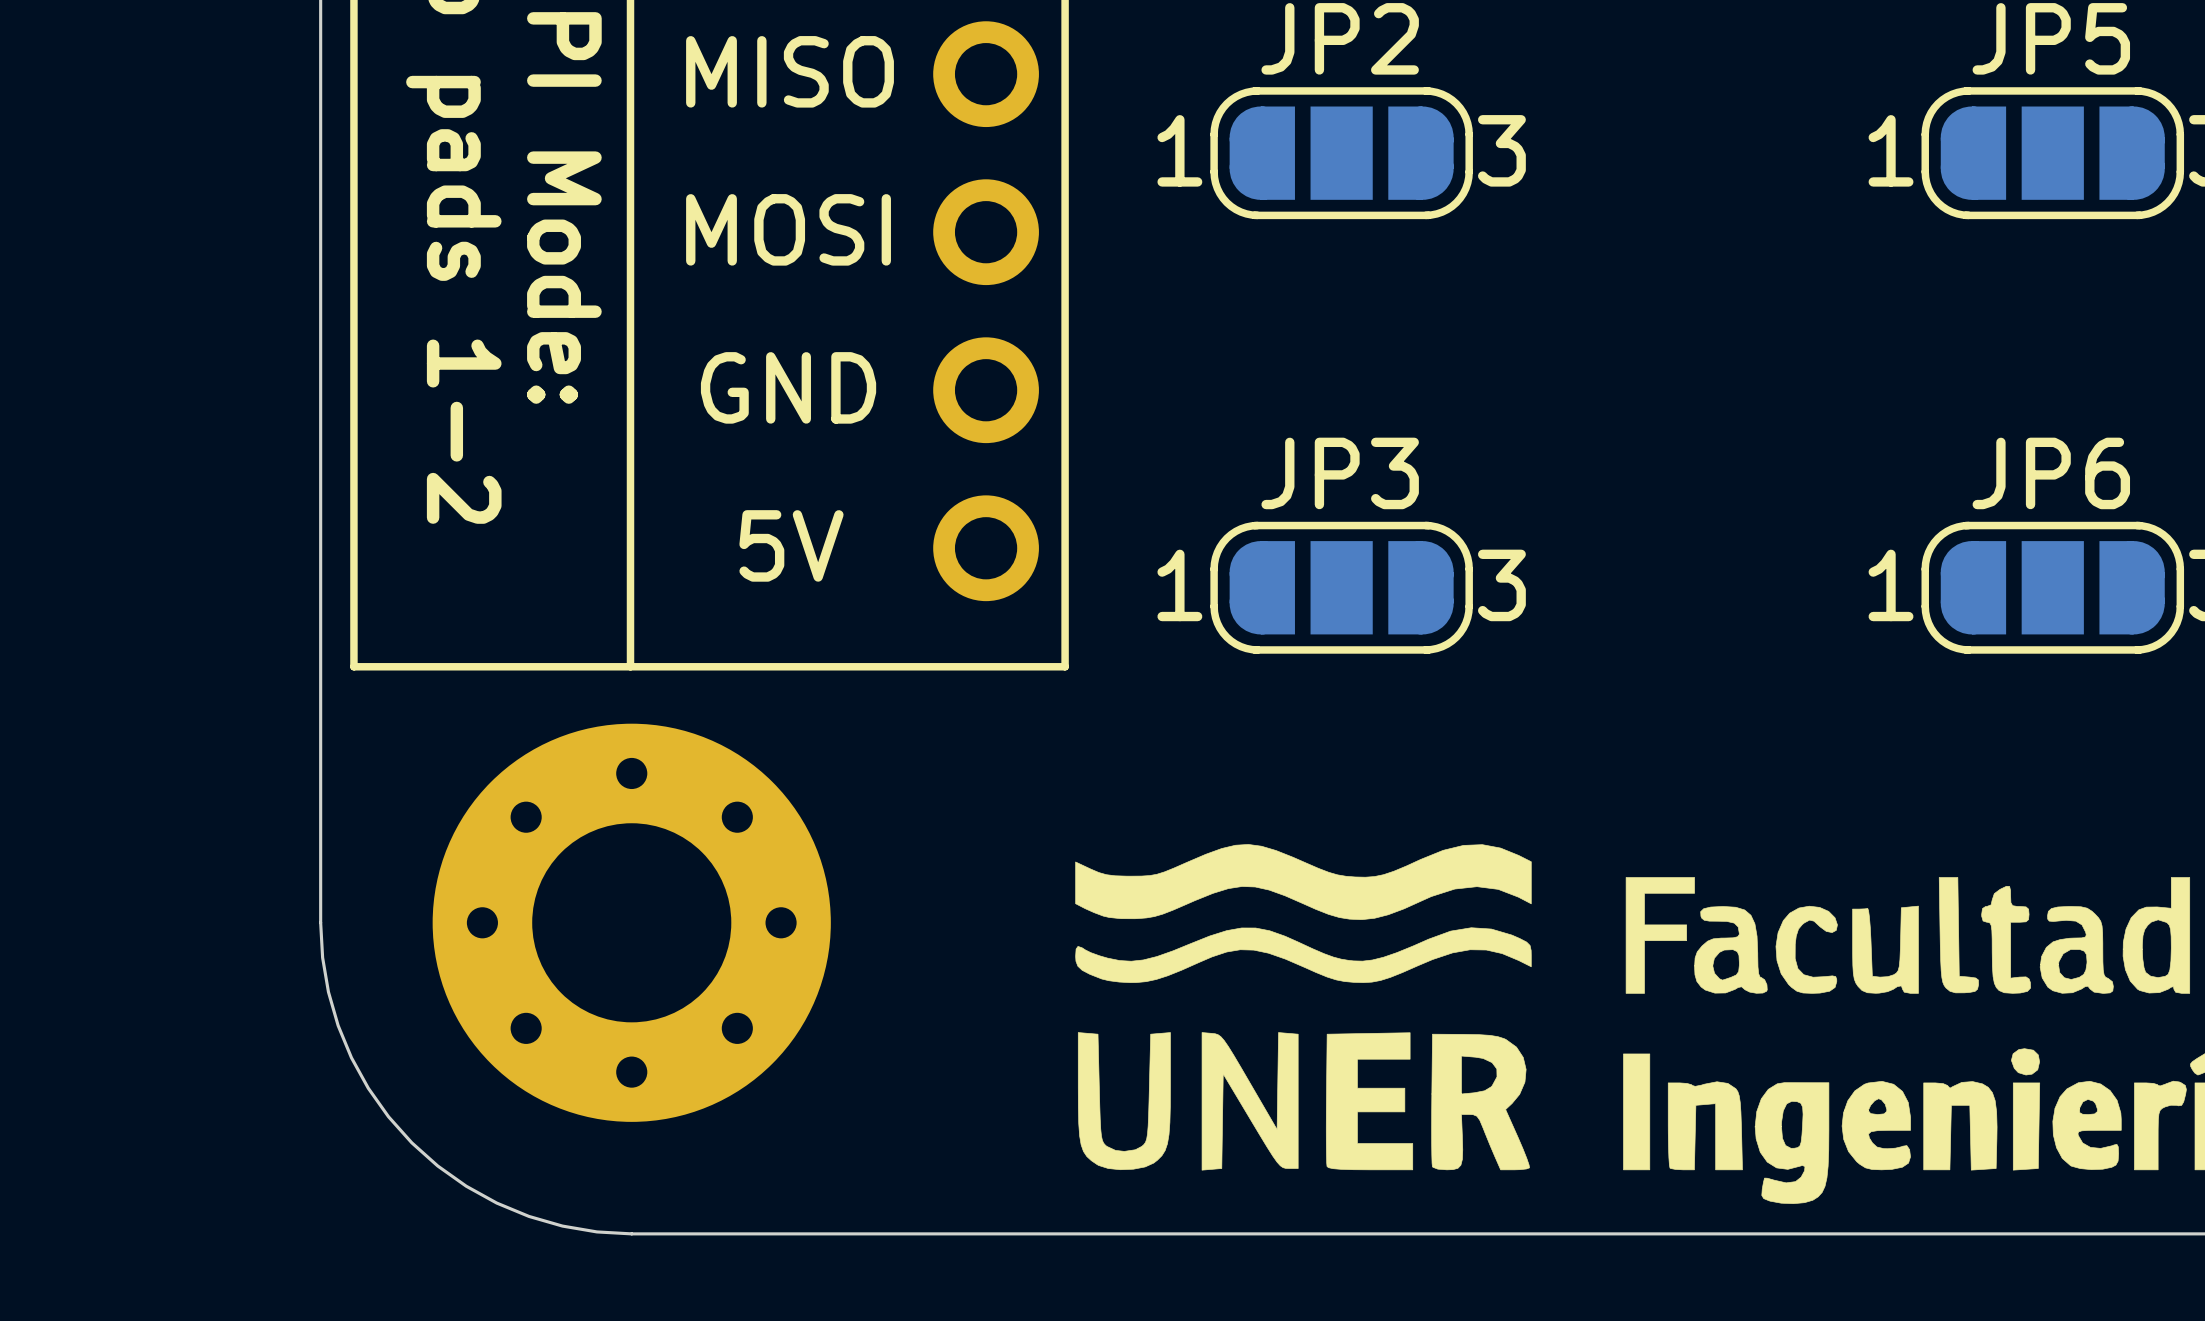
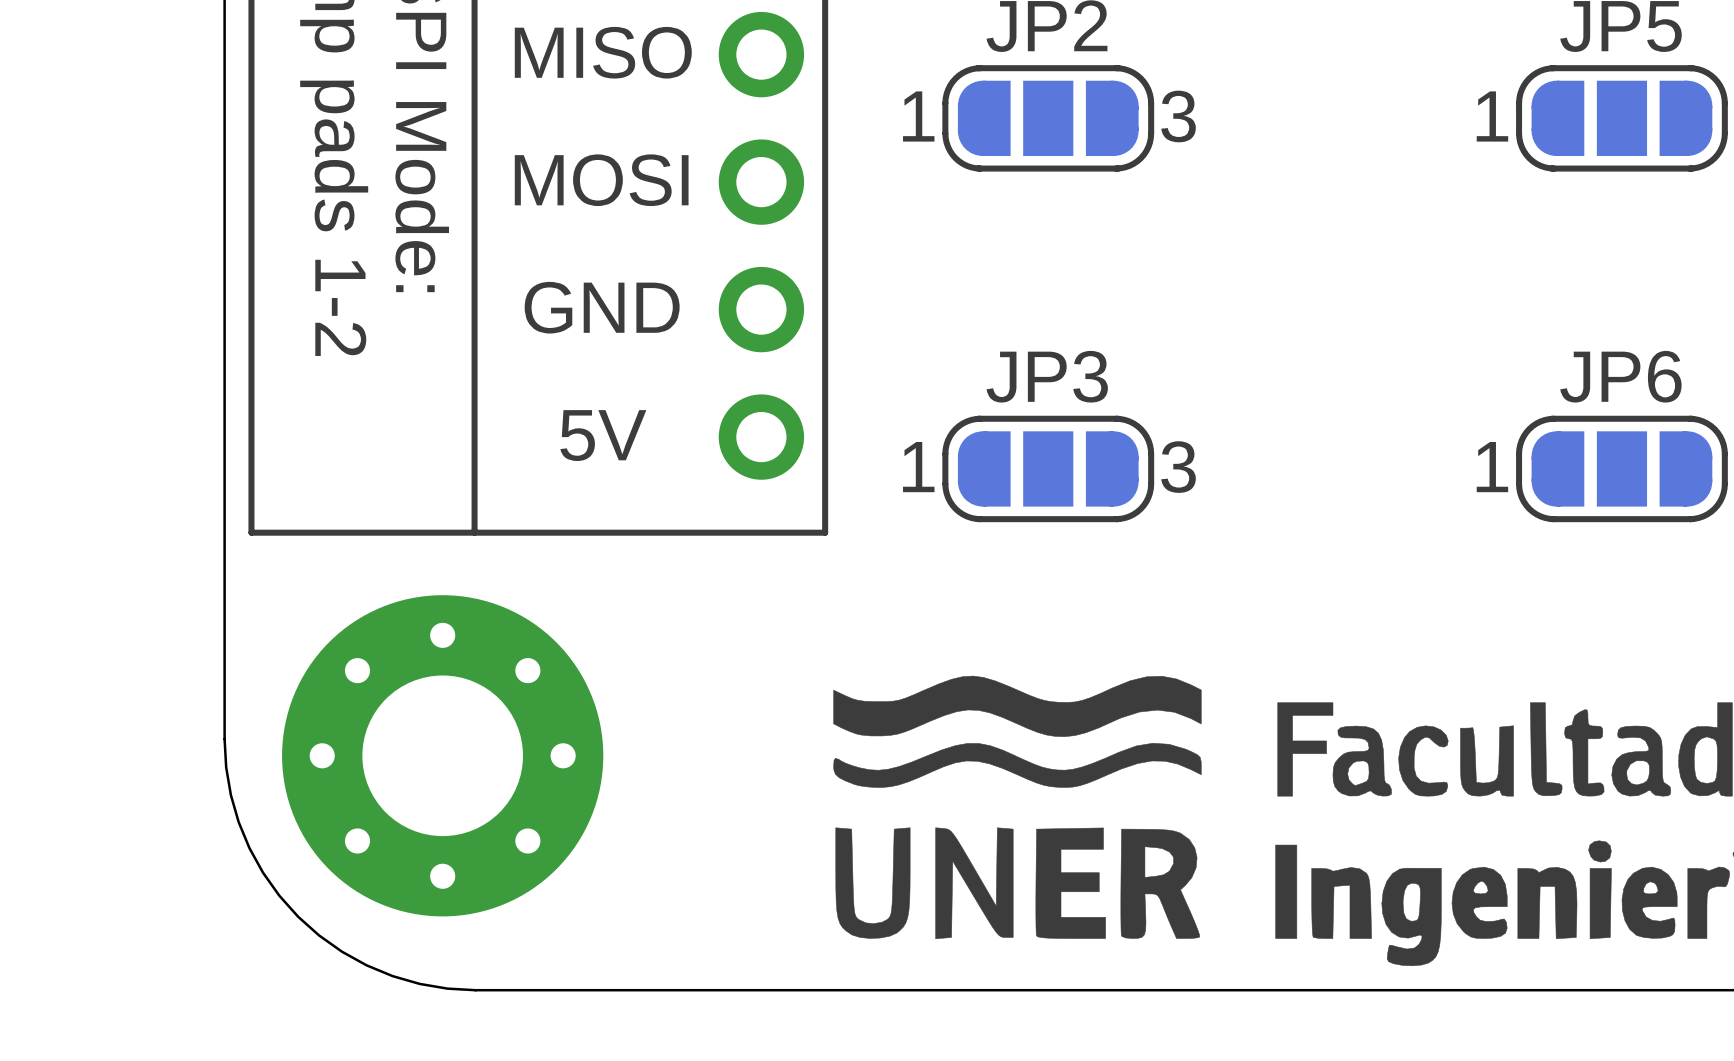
part position: (631, 922) -> (442, 755)

